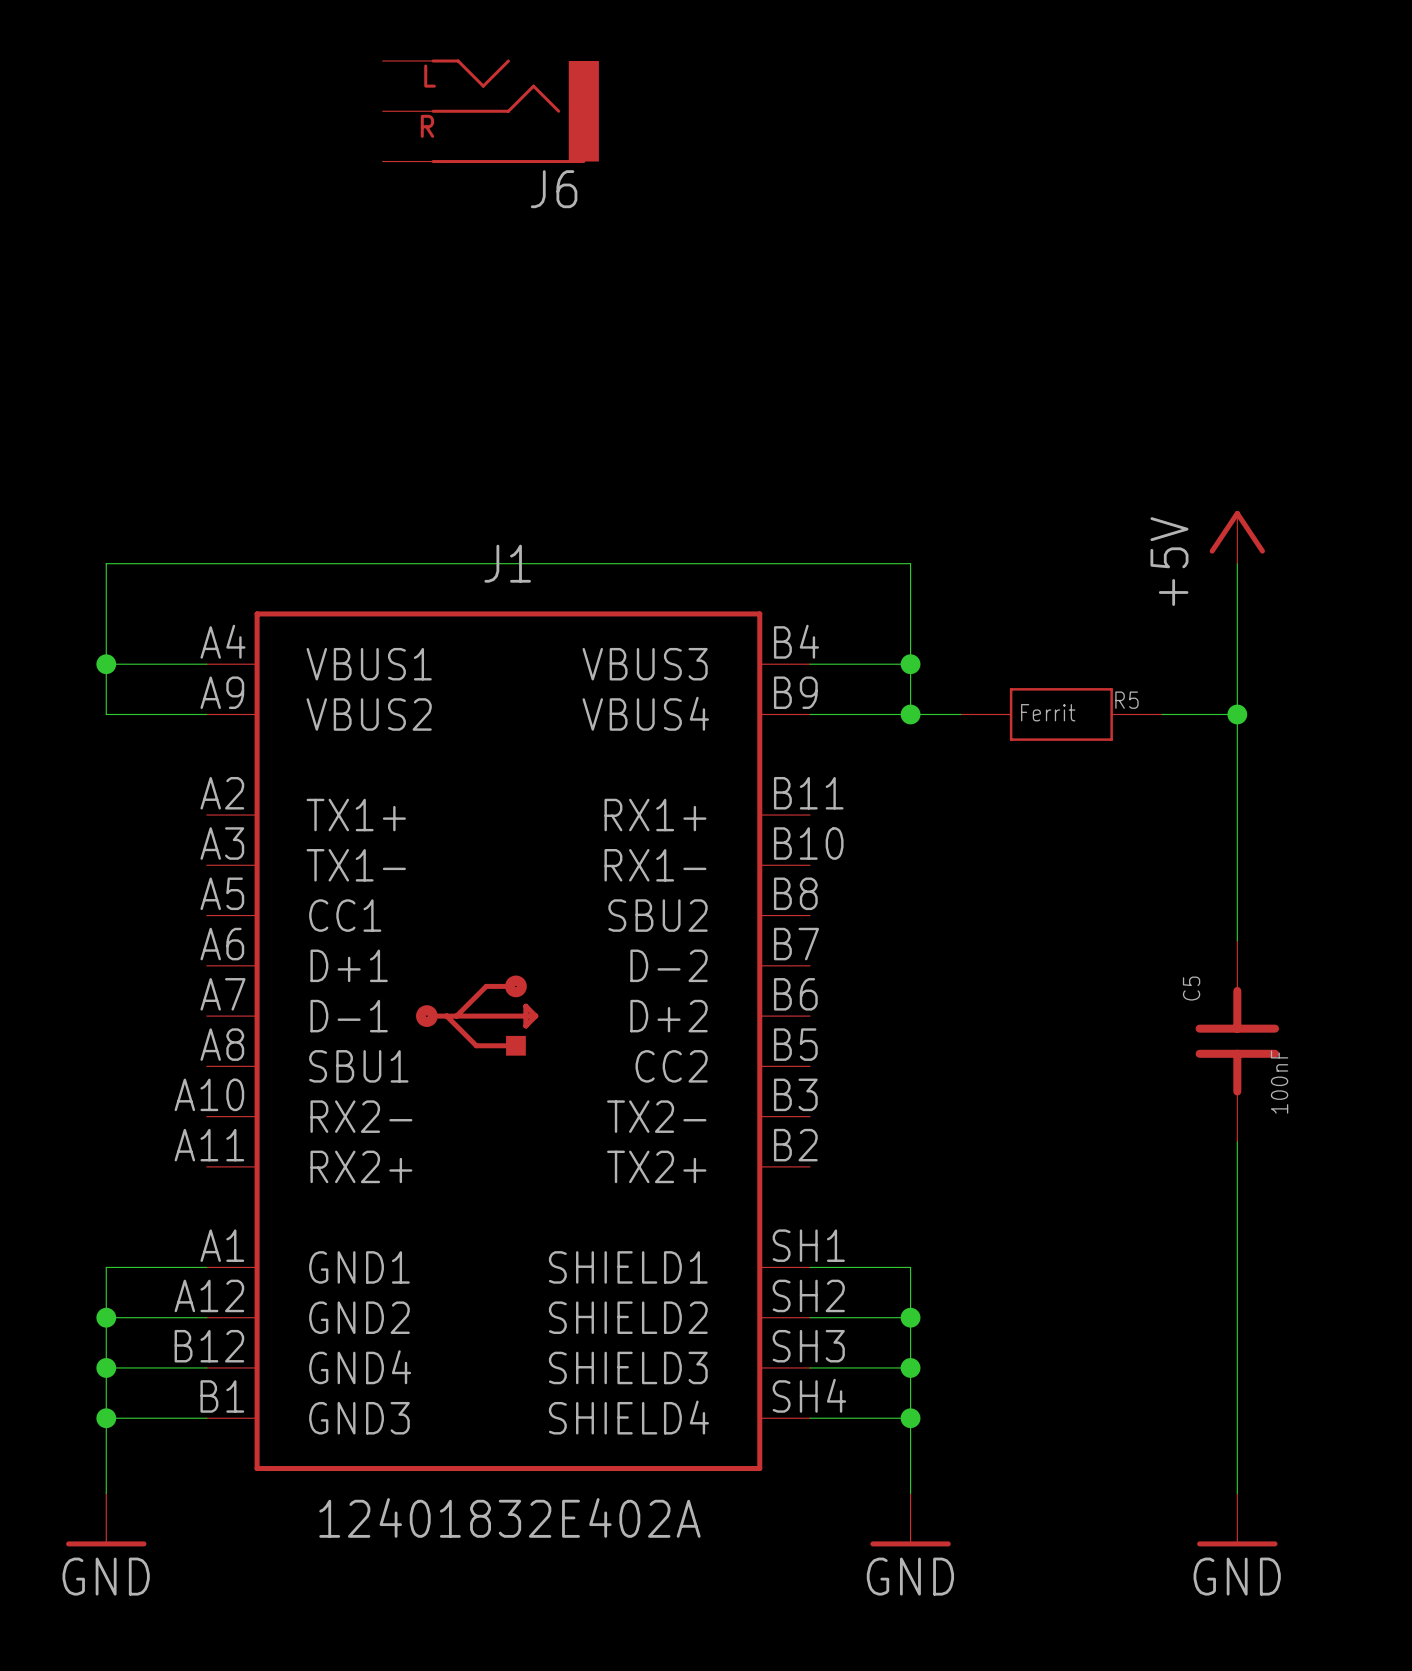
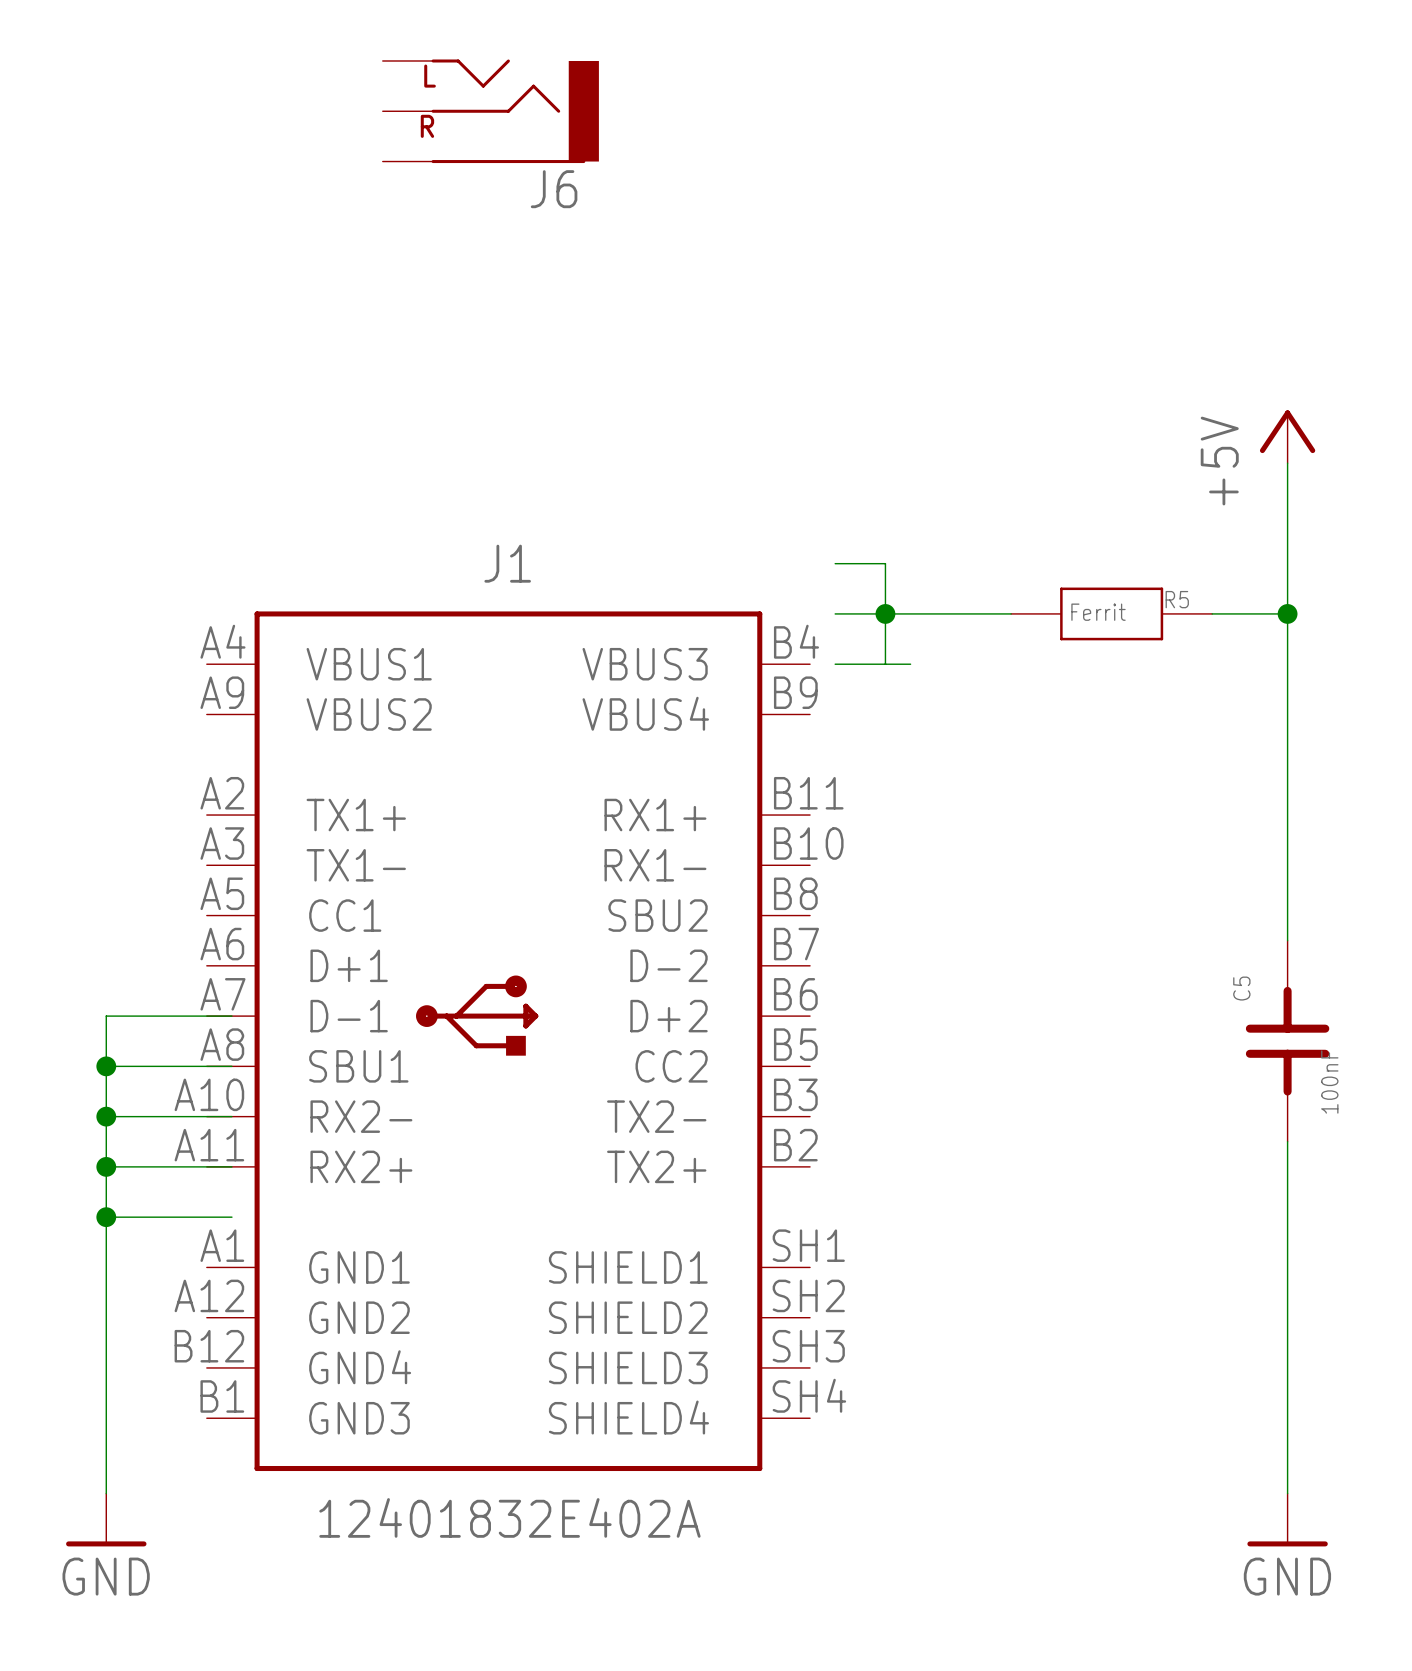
wire: none -> (1287, 463) (1287, 940)
power symbol position: +5V (1237, 537) -> +5V (1287, 436)
wire: (835, 563) (106, 563) (106, 714) (206, 714) -> none
wire: (885, 563) (910, 563) (910, 714) -> (885, 563) (885, 664)
wire: (1237, 563) (1237, 940) -> none
wire: none -> (835, 613) (1011, 613)
junction: none -> (885, 613)
wire: (106, 664) (206, 664) -> none
junction: (106, 664) -> none
wire: (810, 664) (835, 664) -> none
junction: (910, 664) -> none
wire: (810, 714) (960, 714) -> none
junction: (910, 714) -> none
R5 position: (1061, 714) -> (1111, 613)
wire: (1161, 714) (1237, 714) -> (1212, 613) (1287, 613)
junction position: (1237, 714) -> (1287, 613)
C5 position: (1237, 1041) -> (1287, 1041)
wire: none -> (106, 1066) (231, 1066)
junction: none -> (106, 1066)
wire: none -> (106, 1116) (231, 1116)
junction: none -> (106, 1116)
wire: (1237, 1141) (1237, 1493) -> (1287, 1141) (1287, 1493)
wire: none -> (106, 1166) (231, 1166)
junction: none -> (106, 1166)
wire: none -> (106, 1217) (231, 1217)
junction: none -> (106, 1217)
wire: (106, 1267) (206, 1267) -> (106, 1267) (106, 1016) (231, 1016)
wire: (810, 1267) (910, 1267) (910, 1493) -> none
wire: (106, 1317) (206, 1317) -> none
junction: (106, 1317) -> none
wire: (810, 1317) (910, 1317) -> none
junction: (910, 1317) -> none
wire: (106, 1367) (206, 1367) -> none
junction: (106, 1367) -> none
wire: (810, 1367) (910, 1367) -> none
junction: (910, 1367) -> none
wire: (106, 1418) (206, 1418) -> none
junction: (106, 1418) -> none
wire: (810, 1418) (910, 1418) -> none
junction: (910, 1418) -> none
power symbol: GND (910, 1520) -> none
power symbol position: GND (1237, 1520) -> GND (1287, 1520)

